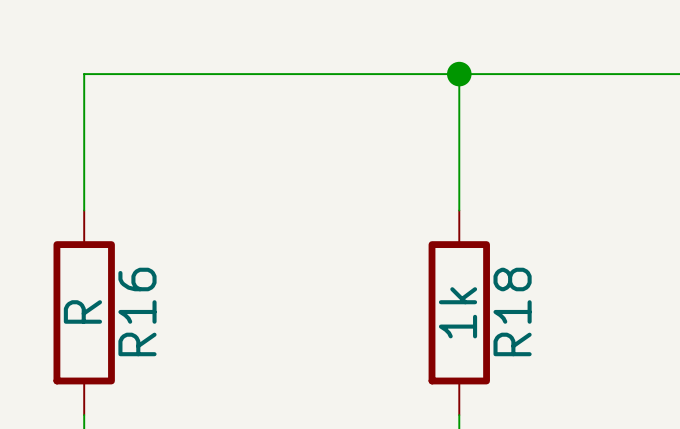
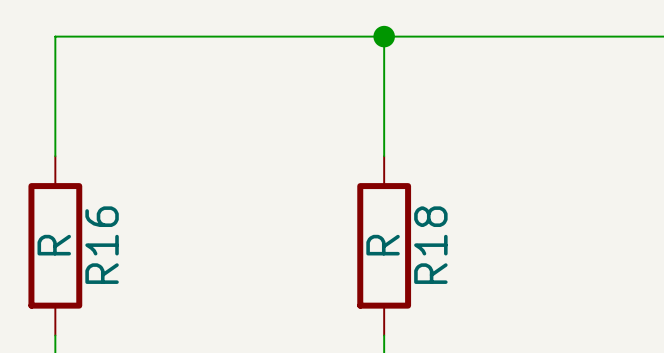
R18 value: 1k (458, 312) -> R (383, 245)

